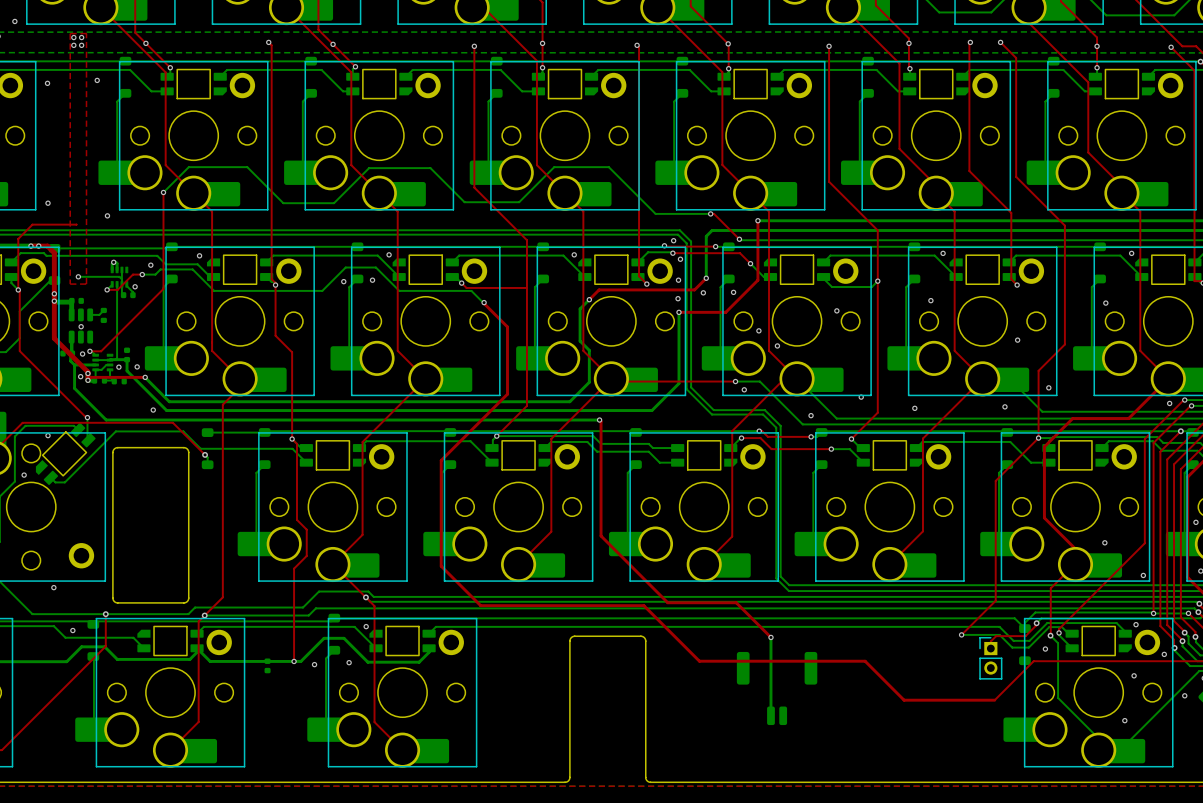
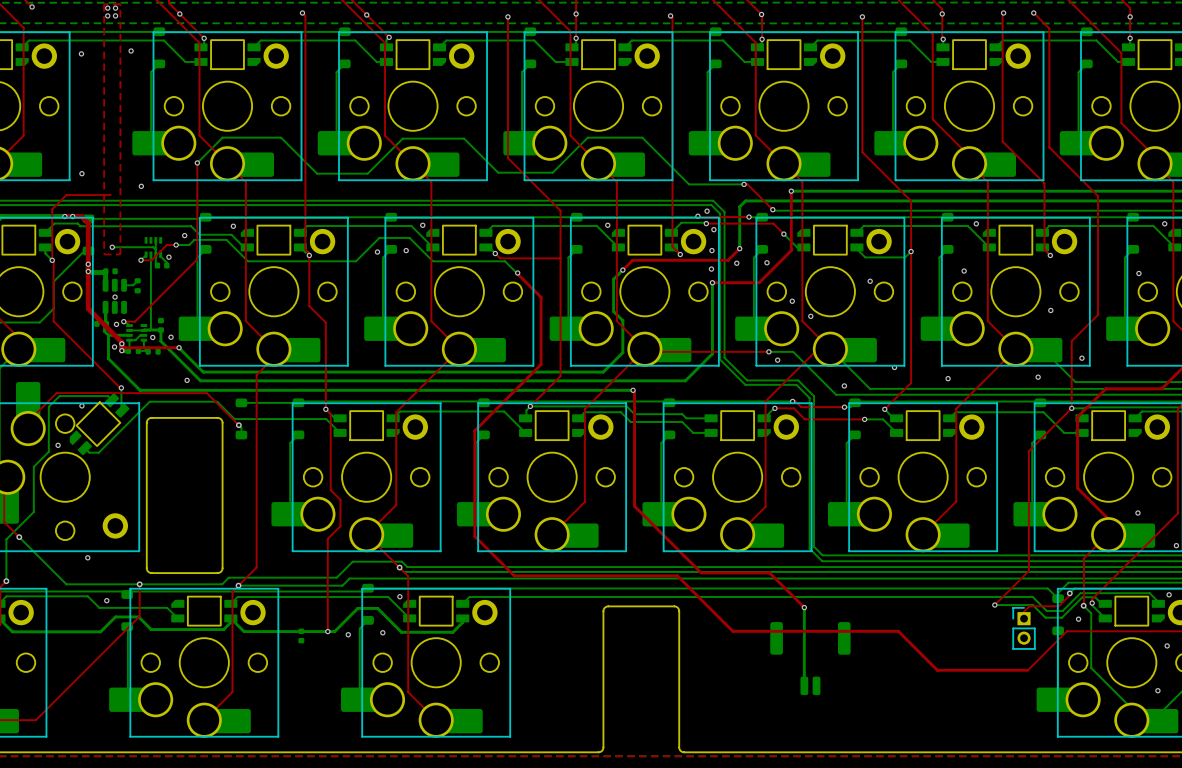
via: (113, 262) -> none
bottom track: (112, 269) (113, 262) (117, 263) (117, 269) -> none

